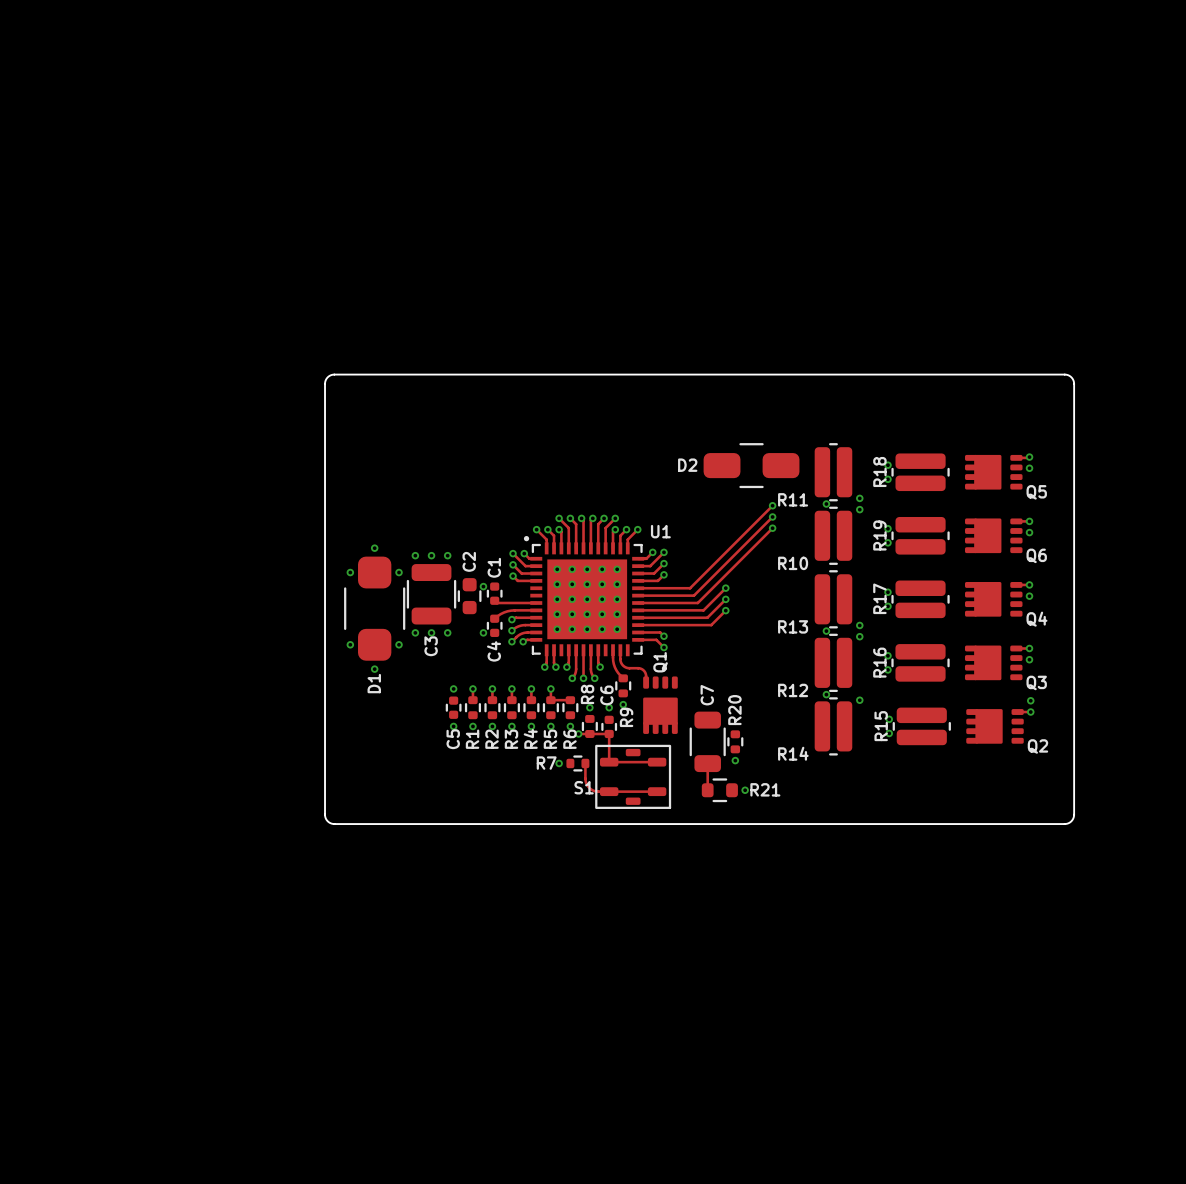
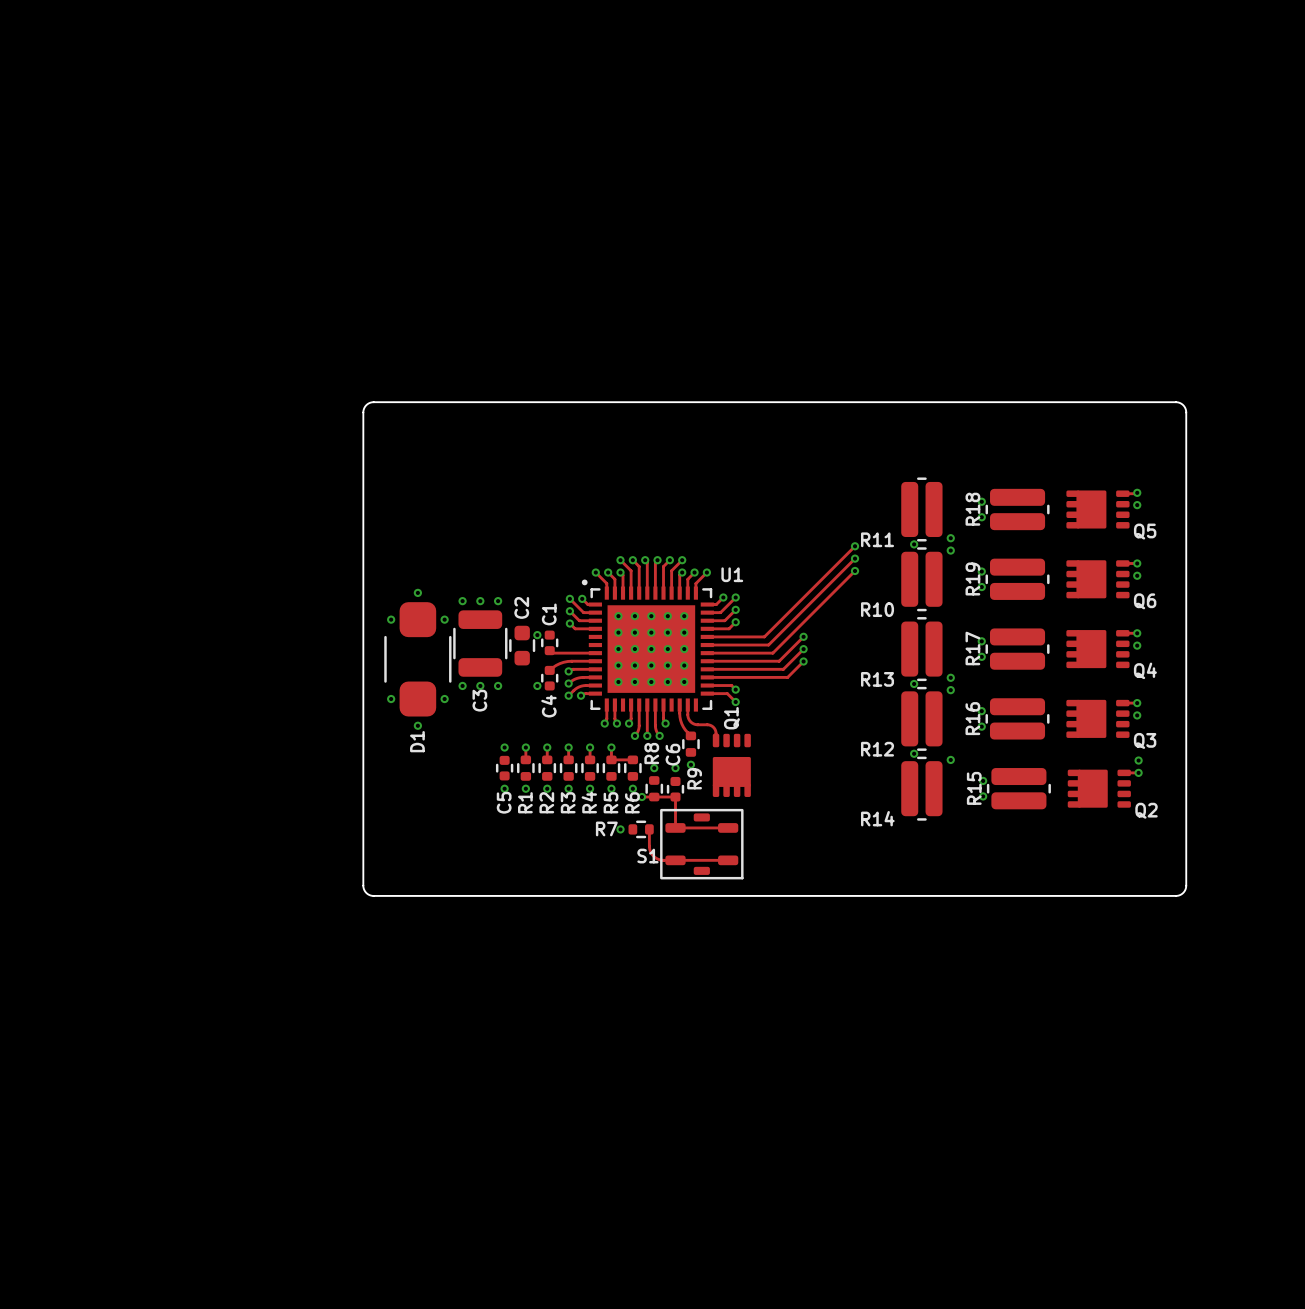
D2: (751, 465) -> none
C7: (707, 741) -> none
R20: (735, 741) -> none
via: (735, 760) -> none
track: (707, 763) (707, 790) -> none
R21: (719, 790) -> none
via: (745, 790) -> none

